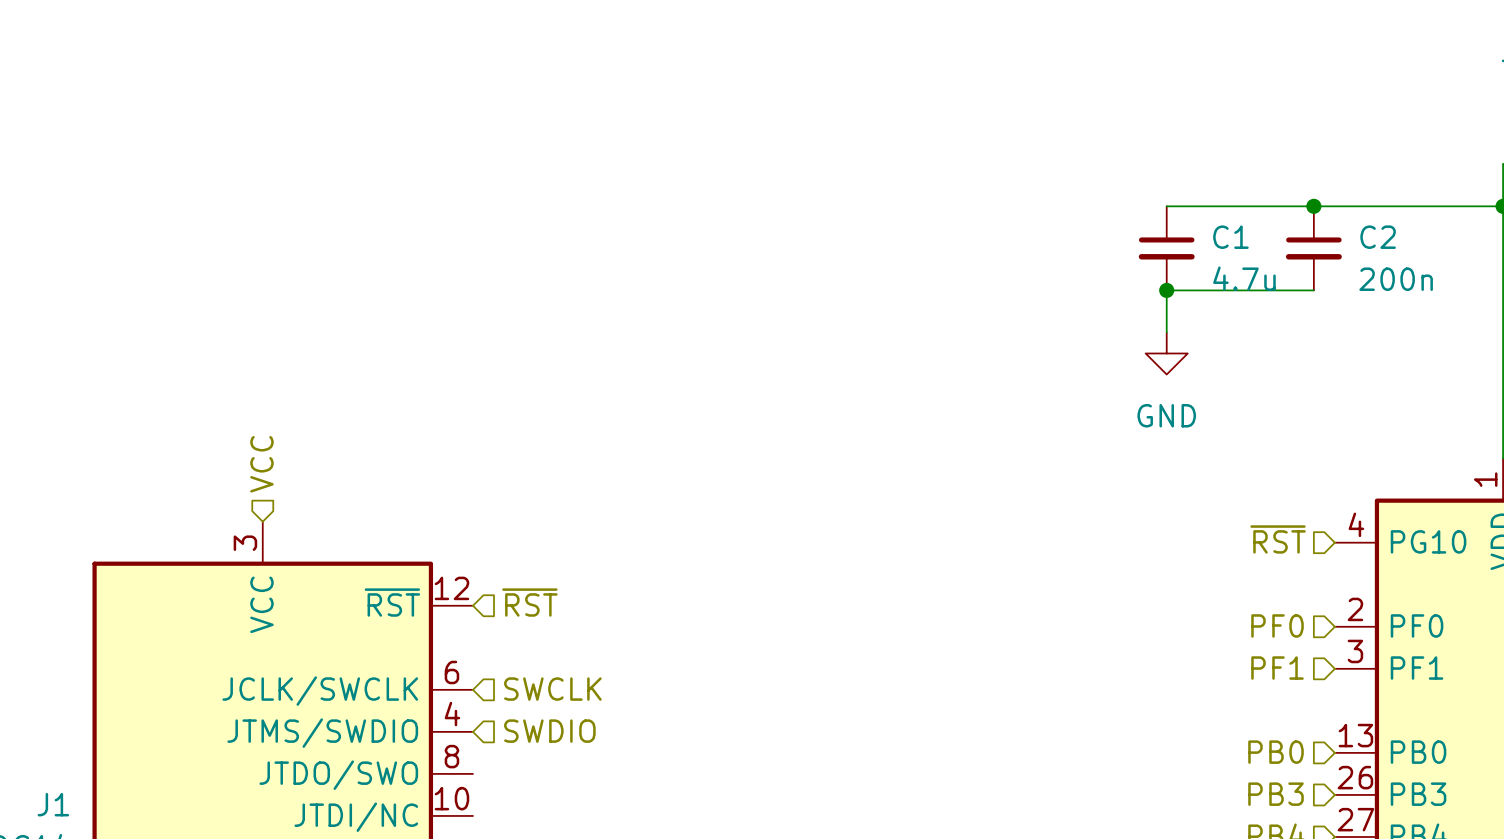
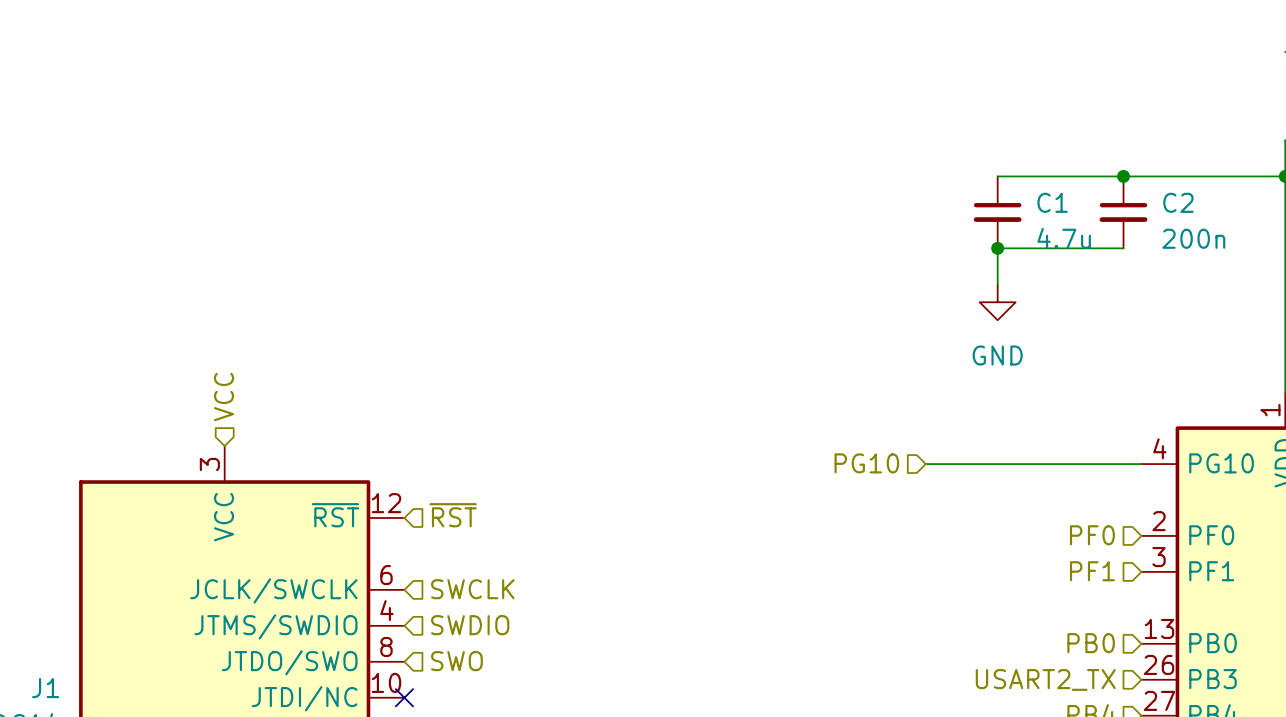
hierarchical label: ~{RST} (1278, 539) -> none
hierarchical label: none -> PG10 (866, 463)
wire: none -> (925, 464) (1141, 464)
hierarchical label: none -> SWO (456, 661)
hierarchical label: PB3 (1276, 794) -> USART2_TX (1045, 679)
no-connect mark: none -> (404, 697)

